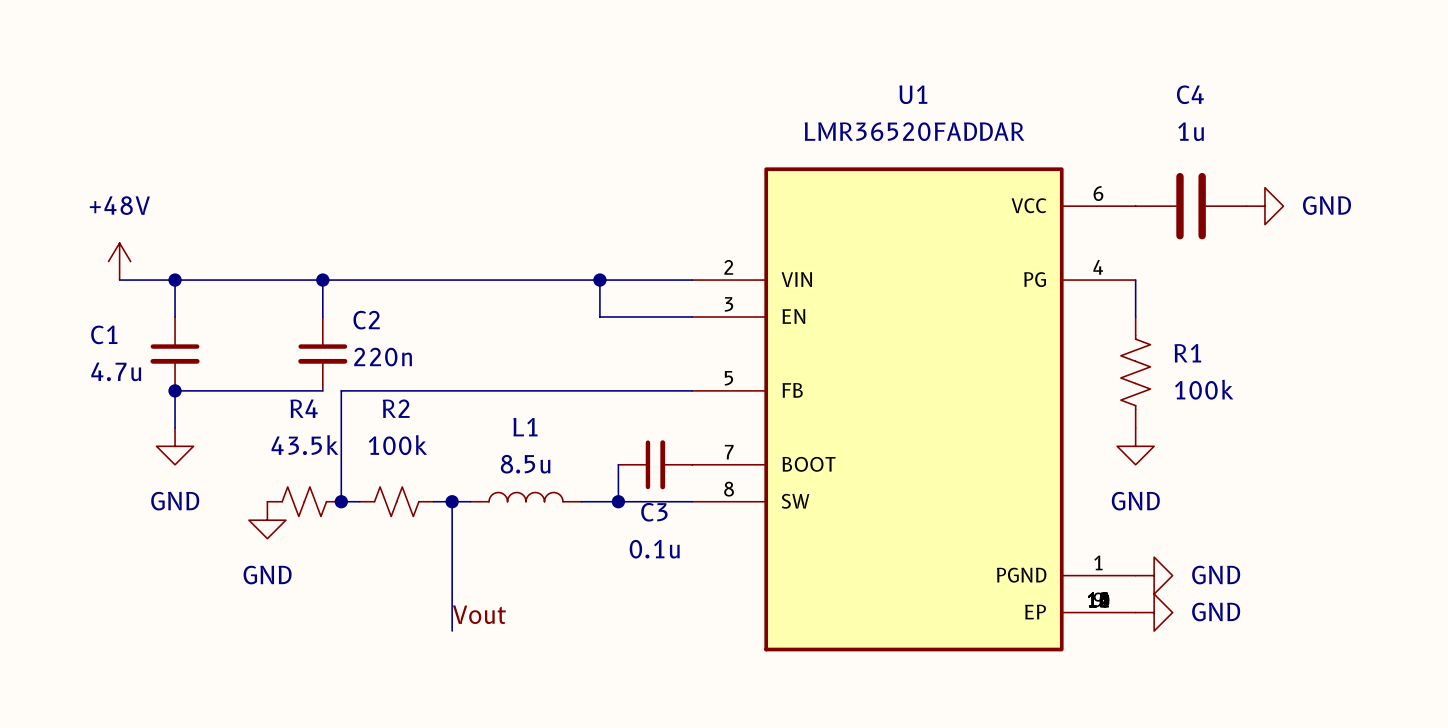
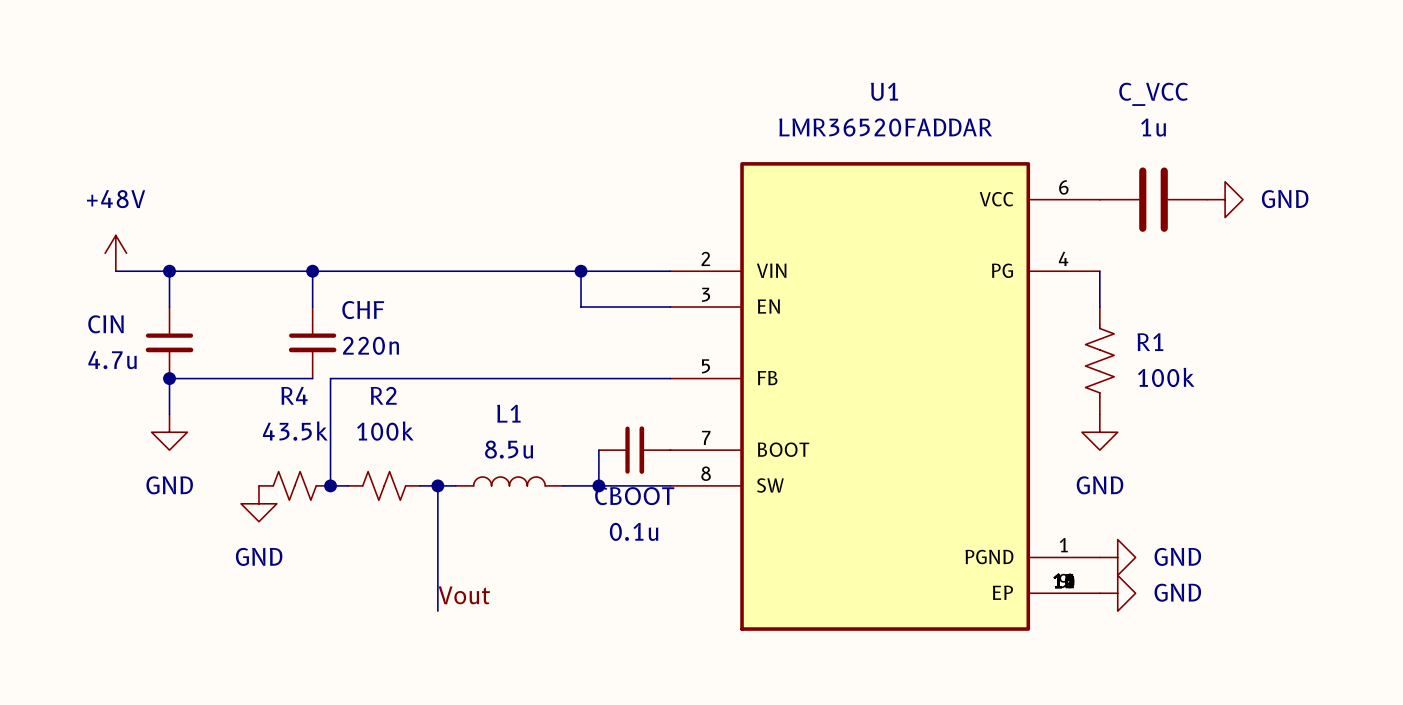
C4 name: C4 (1190, 94) -> C_VCC (1153, 94)
C2 name: C2 (366, 320) -> CHF (363, 310)
C1 name: C1 (104, 334) -> CIN (105, 324)
C3 name: C3 (654, 512) -> CBOOT (634, 496)

